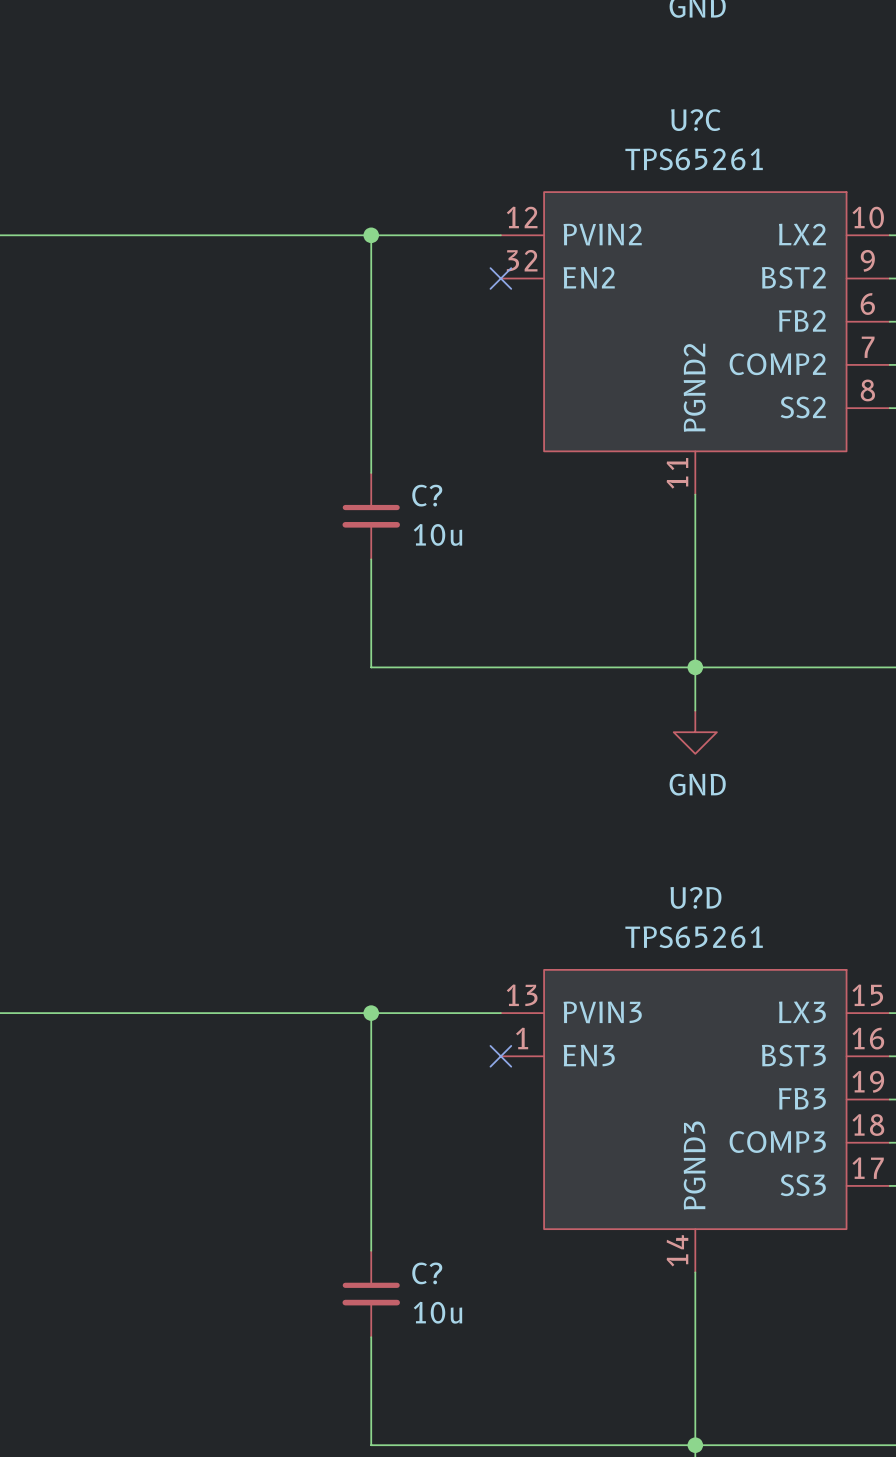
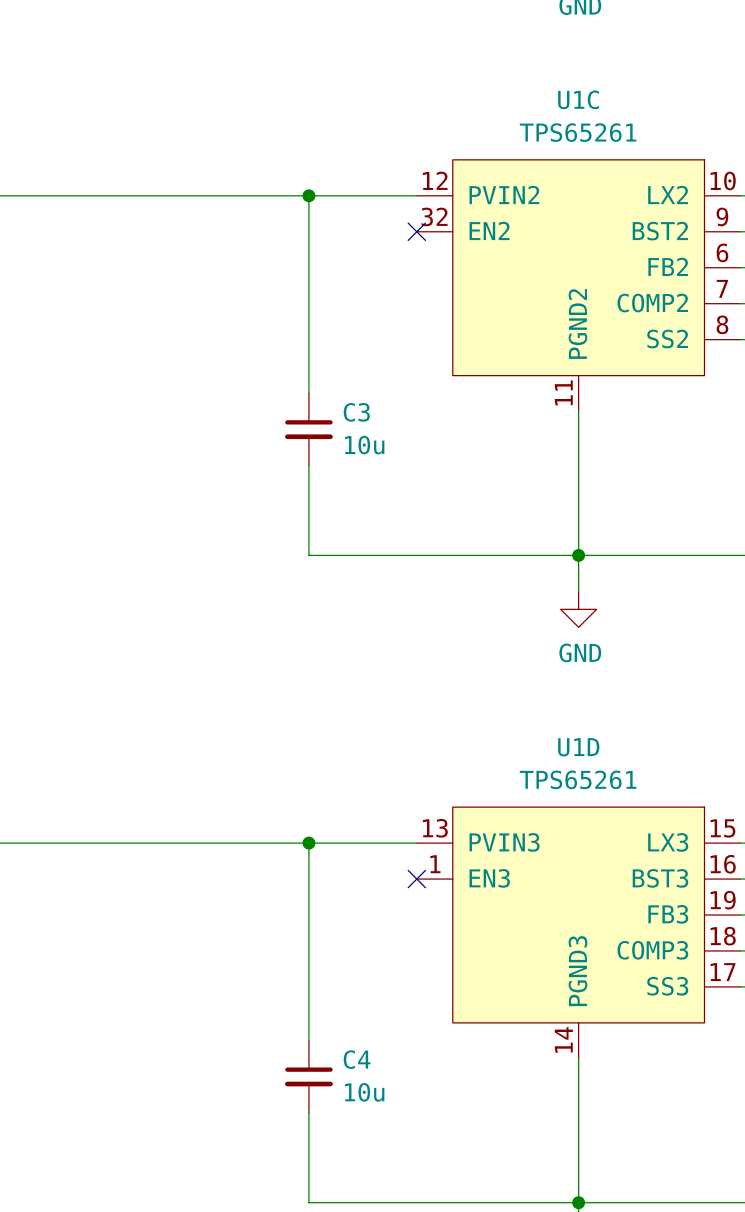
U?C name: U?C (695, 120) -> U1C (578, 99)
C? name: C? (427, 495) -> C3 (356, 412)
U?D name: U?D (695, 897) -> U1D (578, 747)
C? name: C? (427, 1273) -> C4 (357, 1059)

